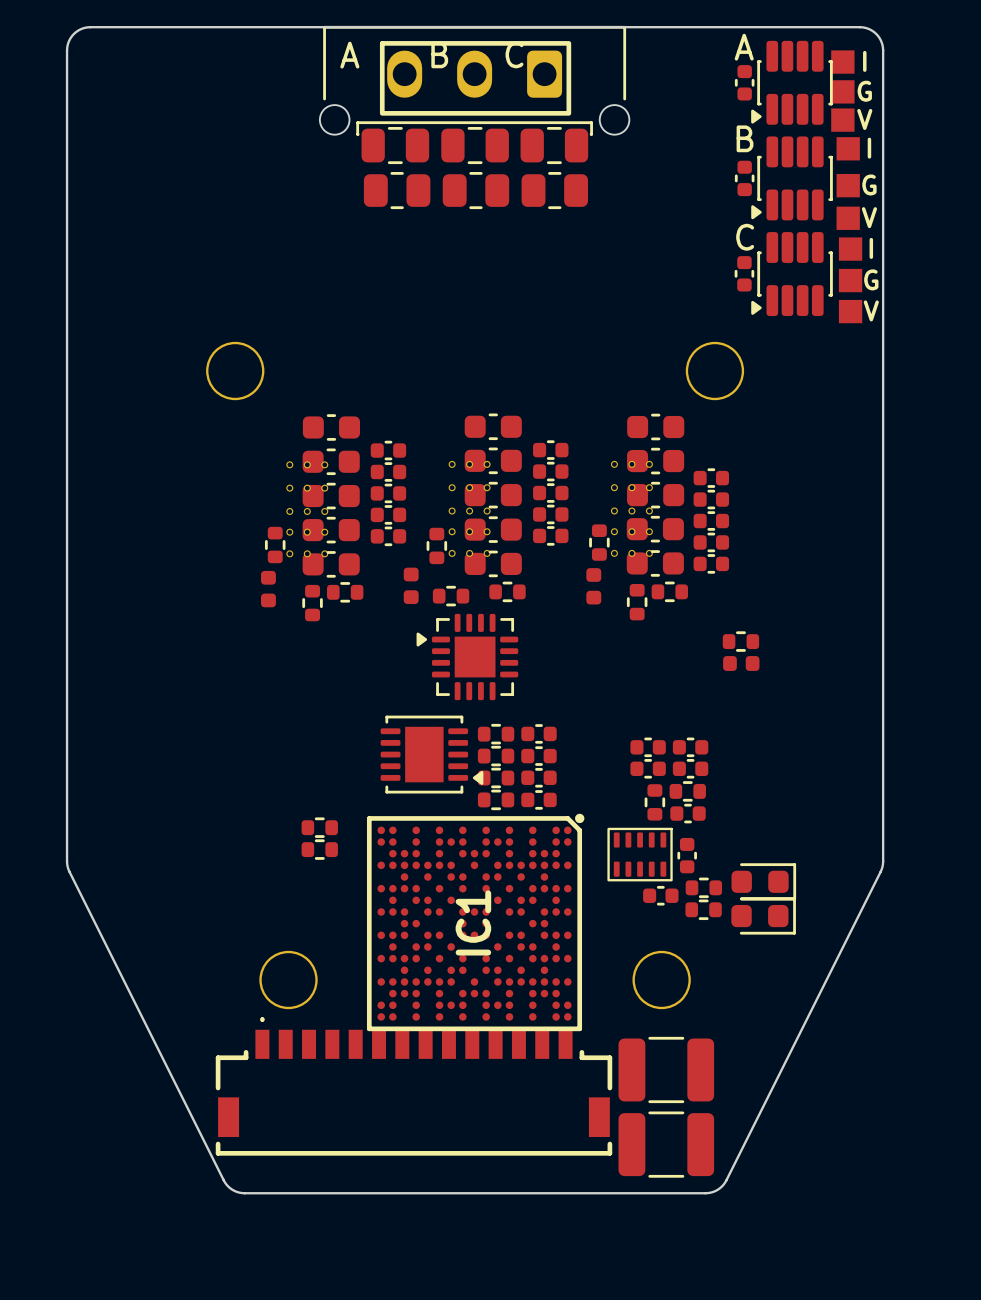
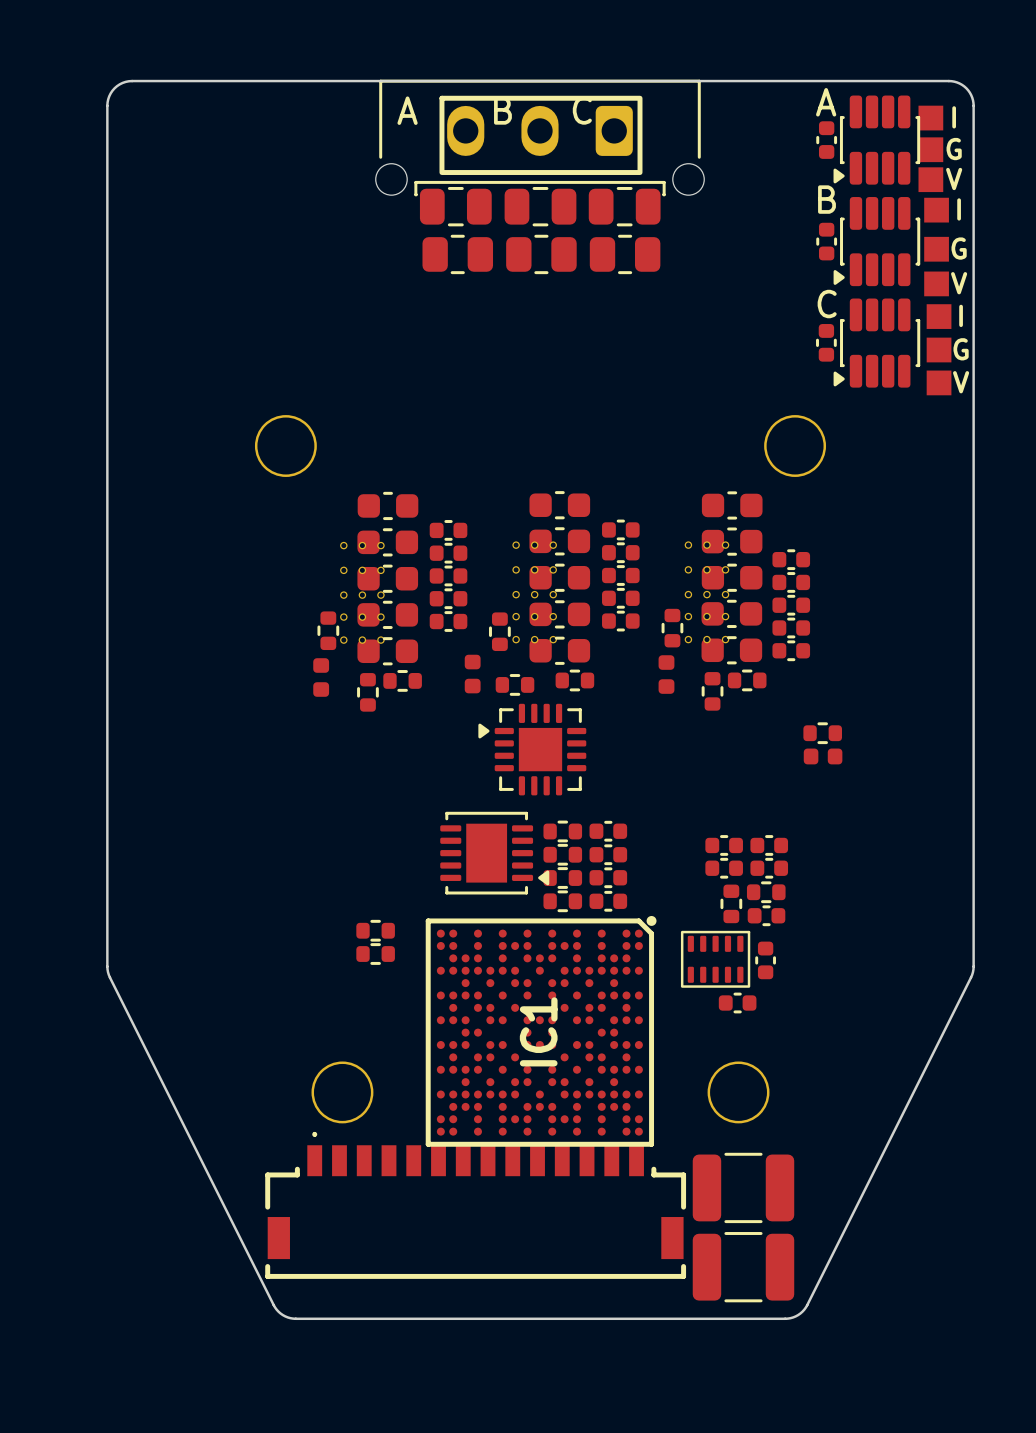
part: (763, 881) -> none
part: (703, 887) -> none
part: (703, 909) -> none
part: (763, 916) -> none

